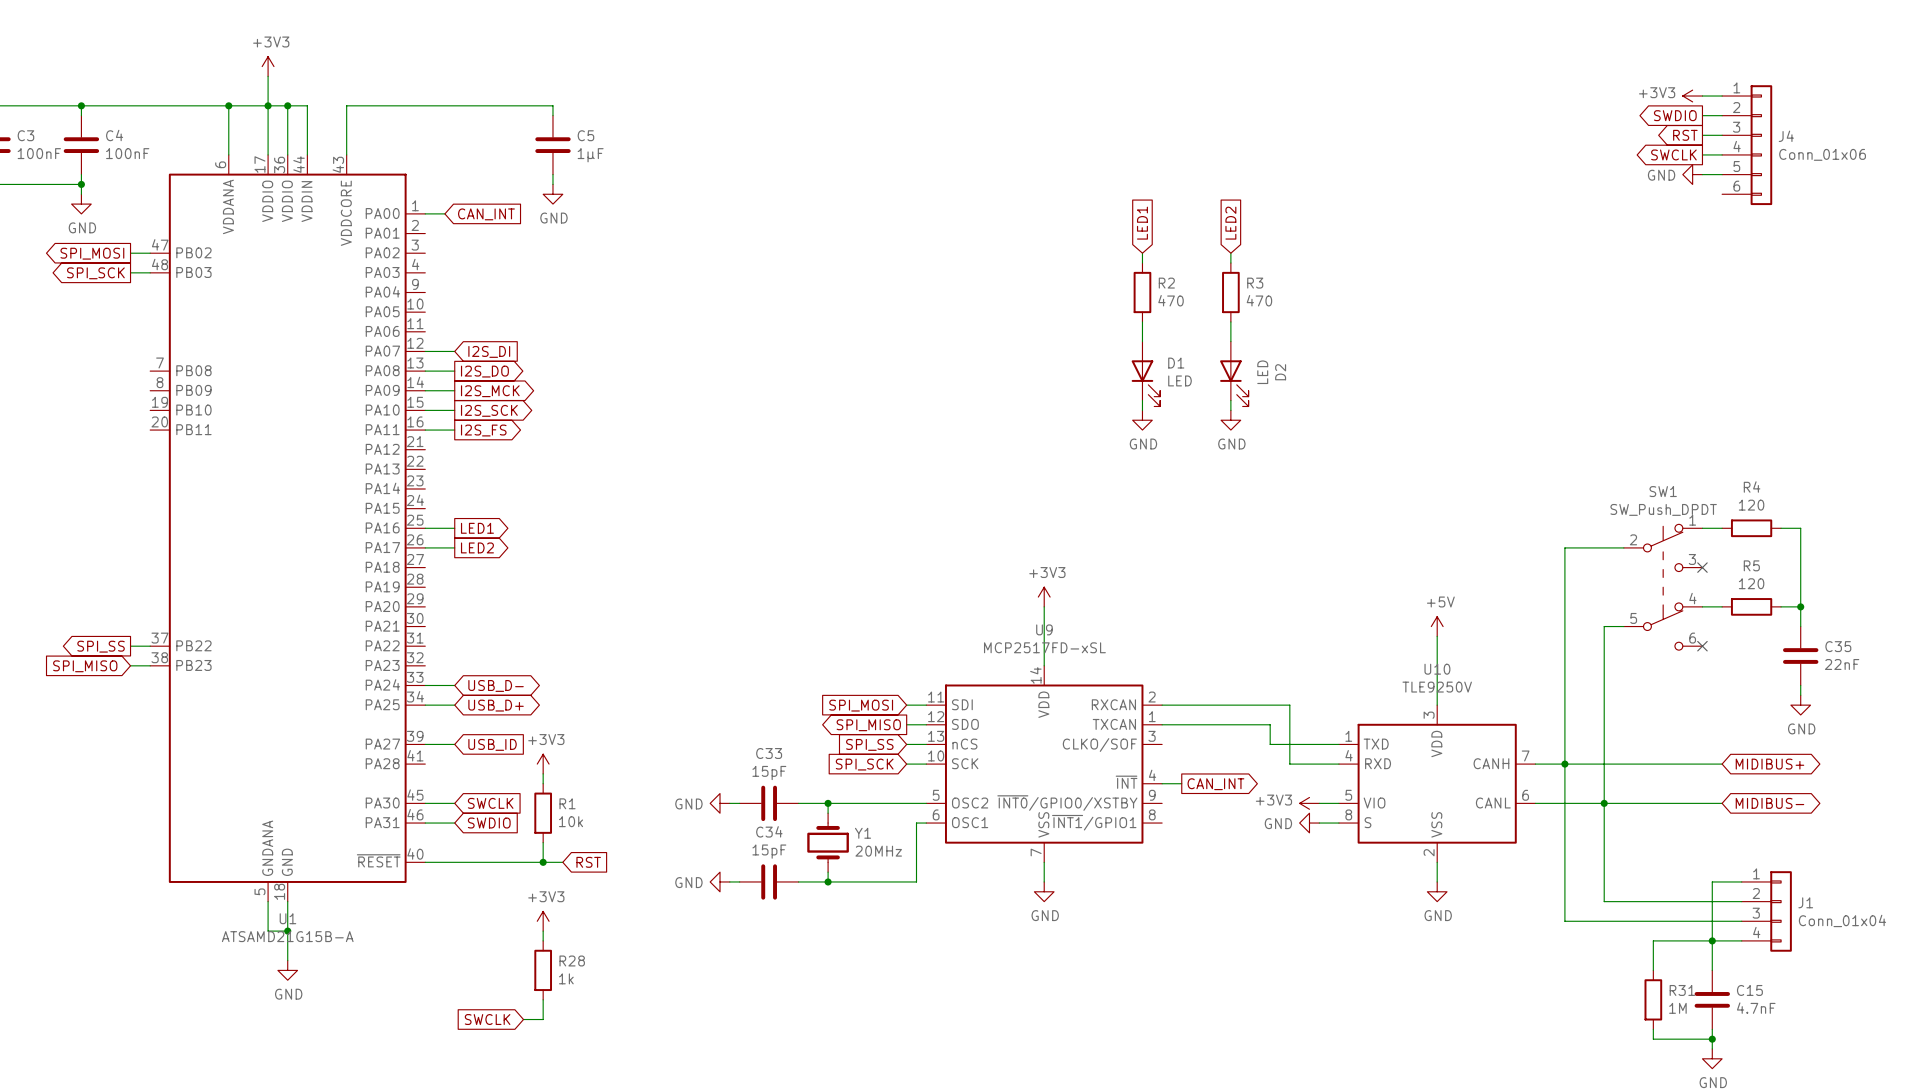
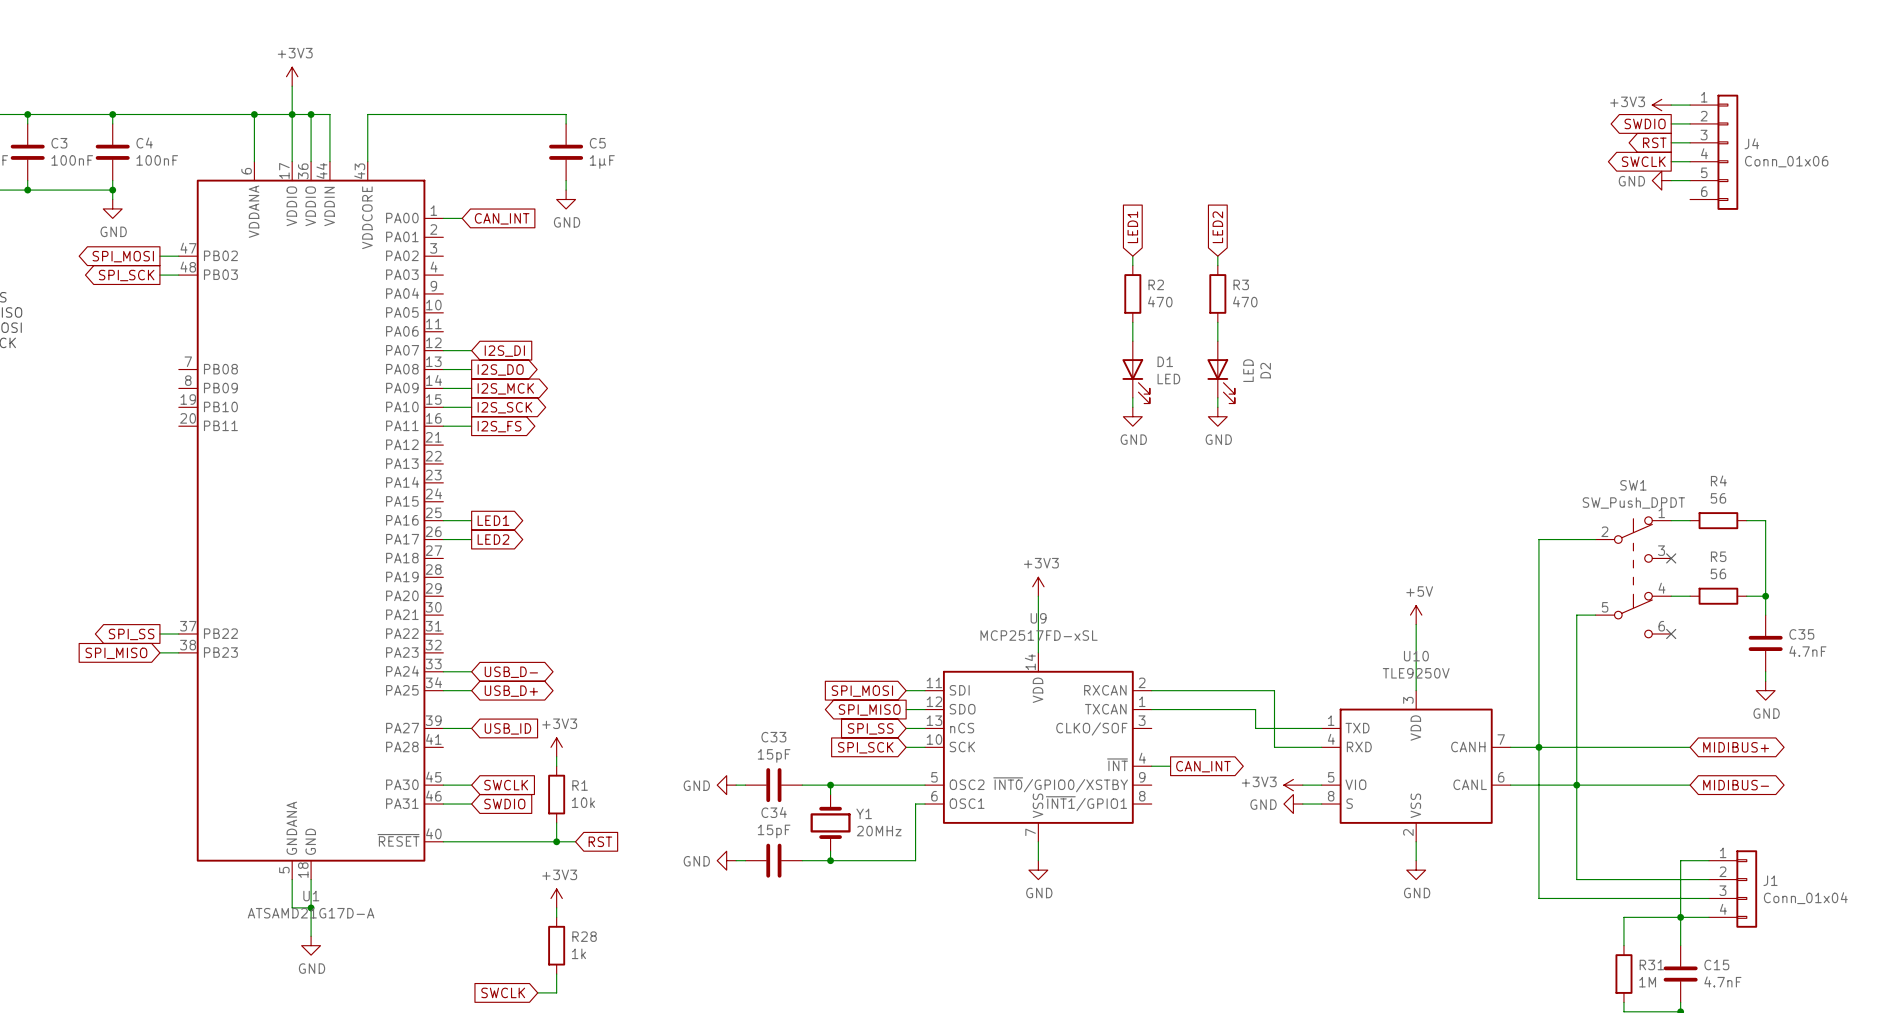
R4 value: 120 (1751, 505) -> 56 (1718, 498)
R5 value: 120 (1751, 583) -> 56 (1718, 573)
C35 value: 22nF (1842, 664) -> 4.7nF (1807, 651)
U1 value: ATSAMD21G15B-A (287, 936) -> ATSAMD21G17D-A (311, 913)

